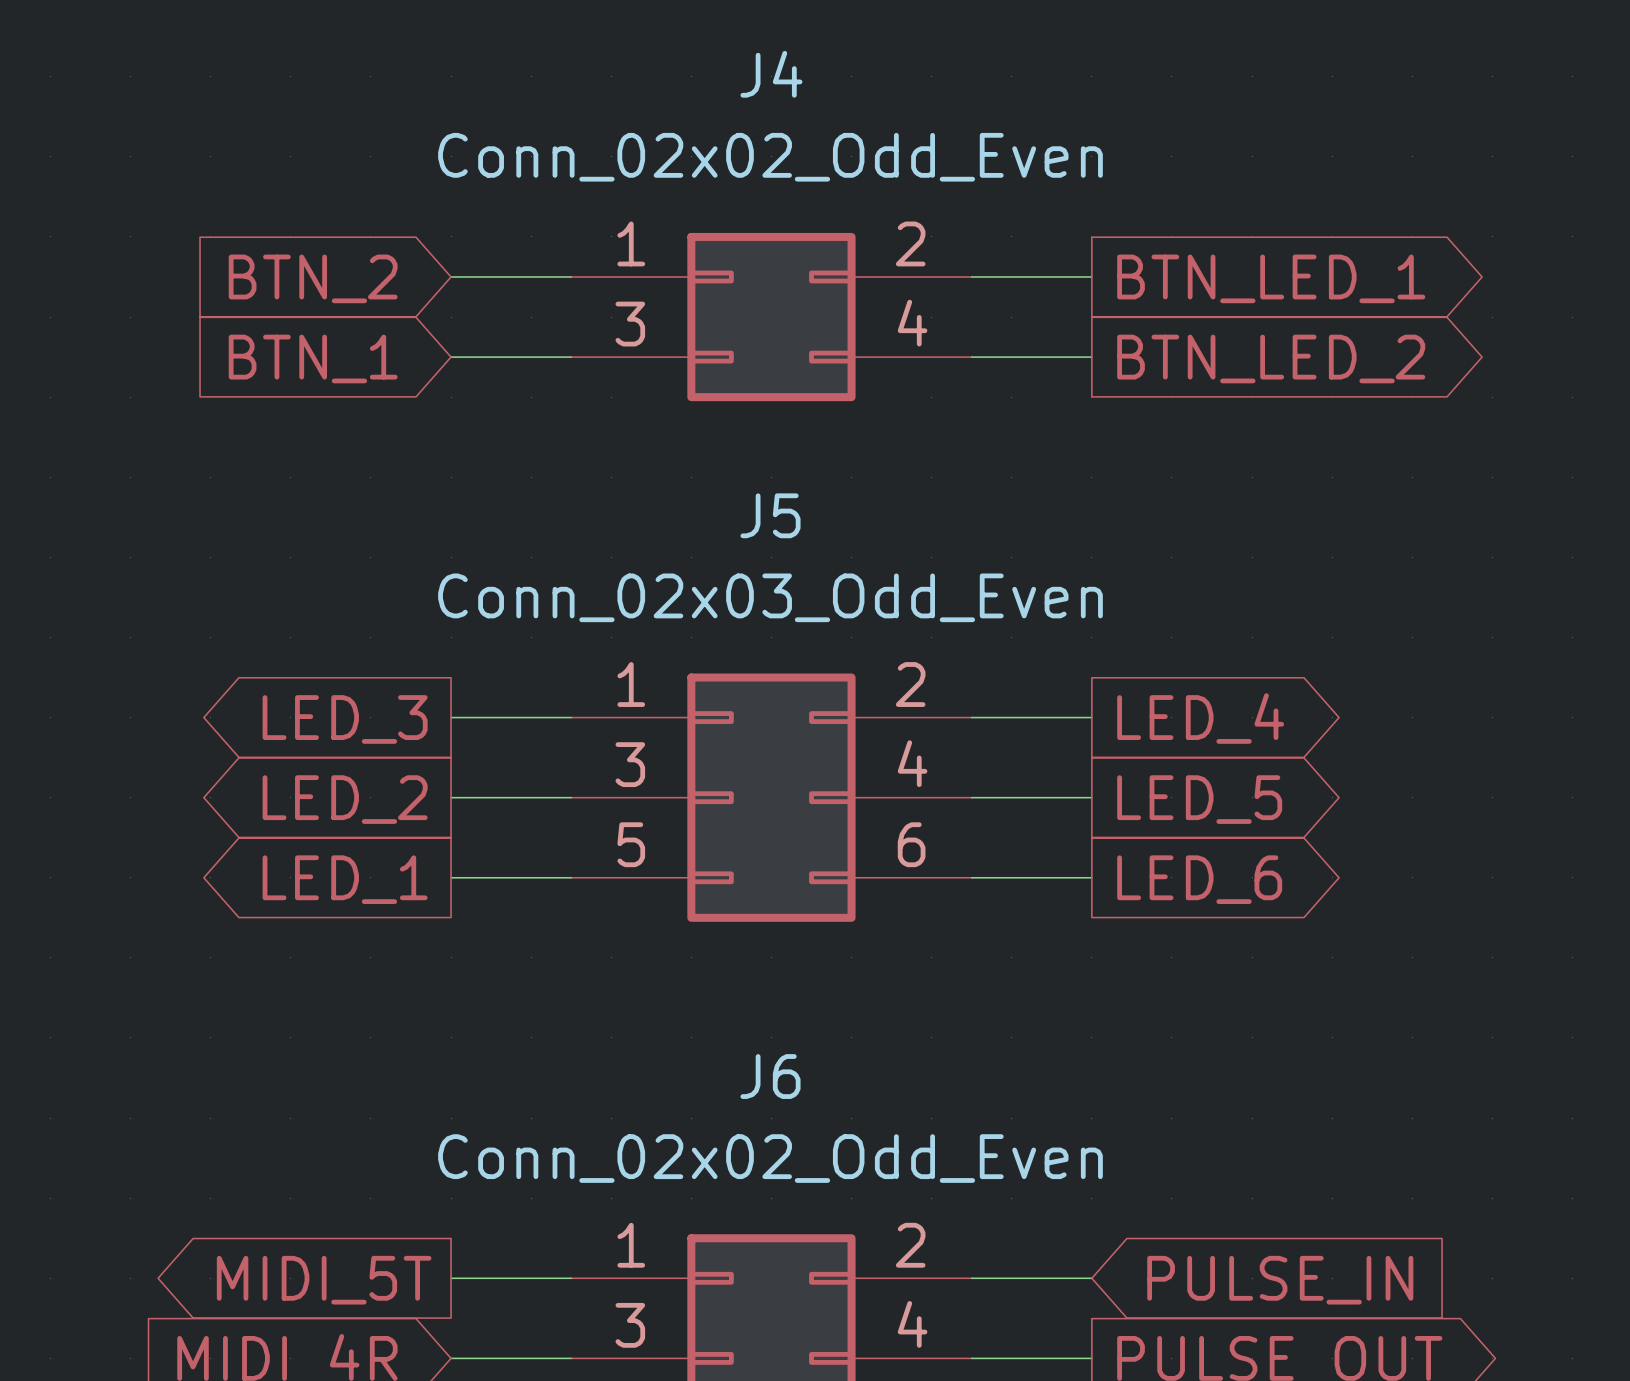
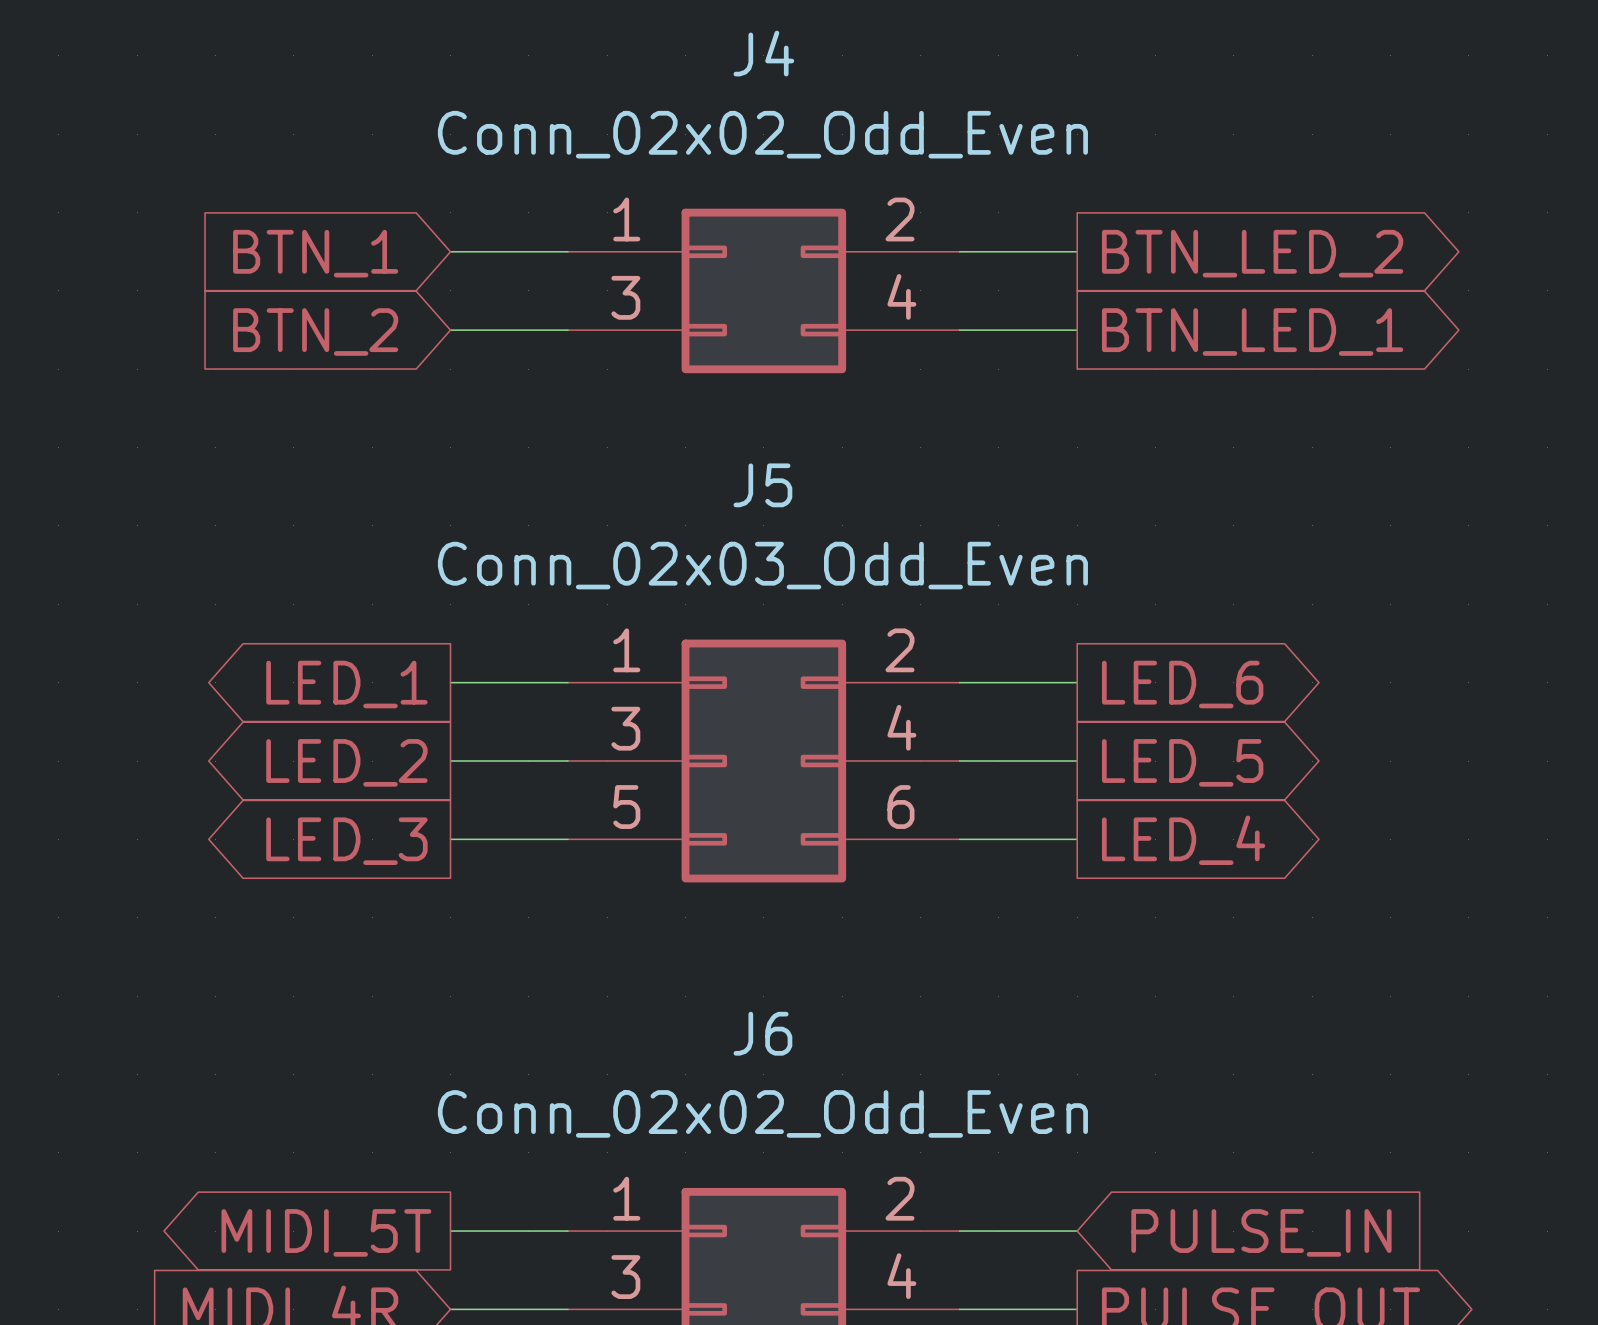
global label: BTN_2 (313, 278) -> BTN_1 (315, 253)
global label: BTN_LED_1 (1271, 278) -> BTN_LED_2 (1252, 253)
global label: BTN_1 (313, 359) -> BTN_2 (315, 332)
global label: BTN_LED_2 (1271, 359) -> BTN_LED_1 (1252, 332)
global label: LED_4 (1200, 718) -> LED_6 (1182, 684)
global label: LED_3 (345, 719) -> LED_1 (346, 684)
global label: LED_1 (345, 879) -> LED_3 (346, 841)
global label: LED_6 (1199, 879) -> LED_4 (1183, 840)

